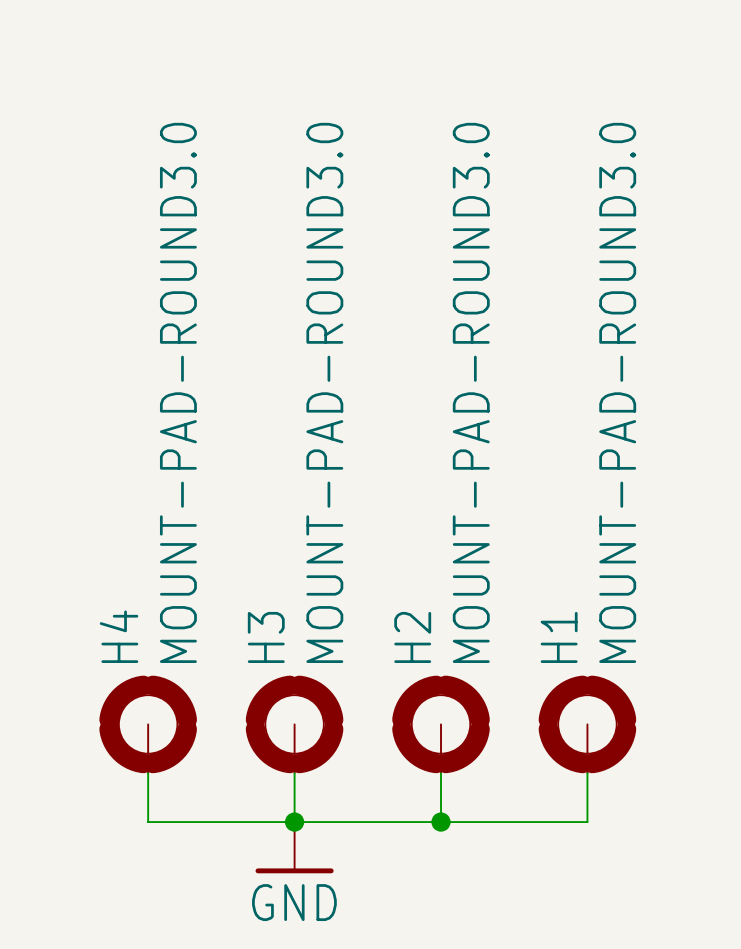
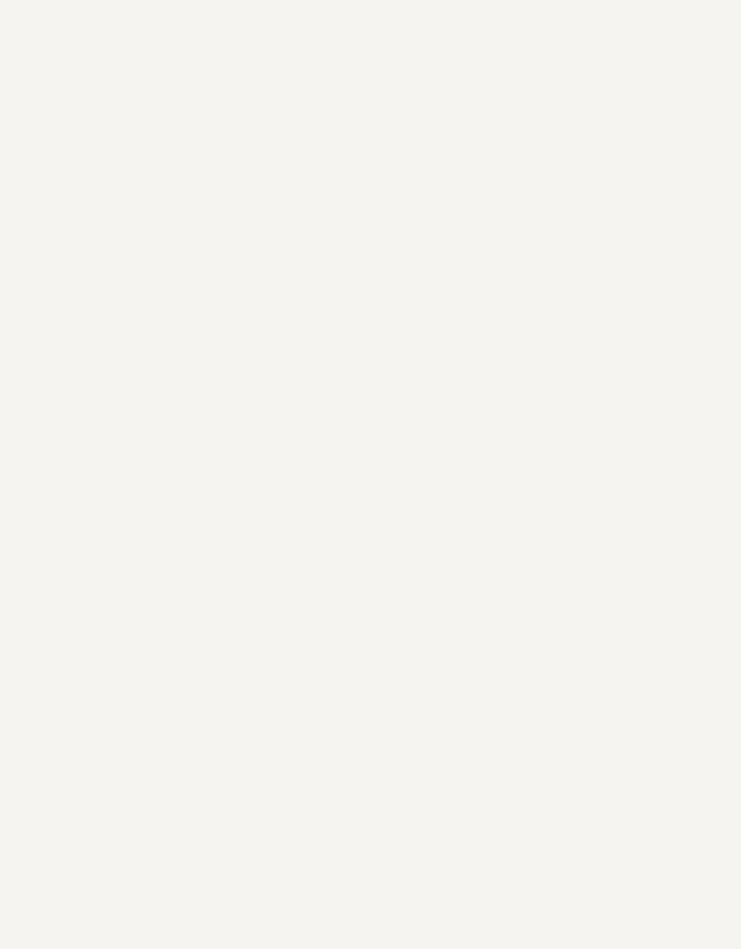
H4: MOUNT-PAD-ROUND3.0 (148, 724) -> none
H3: MOUNT-PAD-ROUND3.0 (294, 724) -> none
H2: MOUNT-PAD-ROUND3.0 (441, 724) -> none
H1: MOUNT-PAD-ROUND3.0 (587, 724) -> none
wire: (148, 773) (148, 822) (587, 822) (587, 773) -> none
wire: (294, 773) (294, 822) -> none
wire: (441, 773) (441, 822) -> none
junction: (294, 822) -> none
junction: (441, 822) -> none
power symbol: GND (294, 847) -> none

